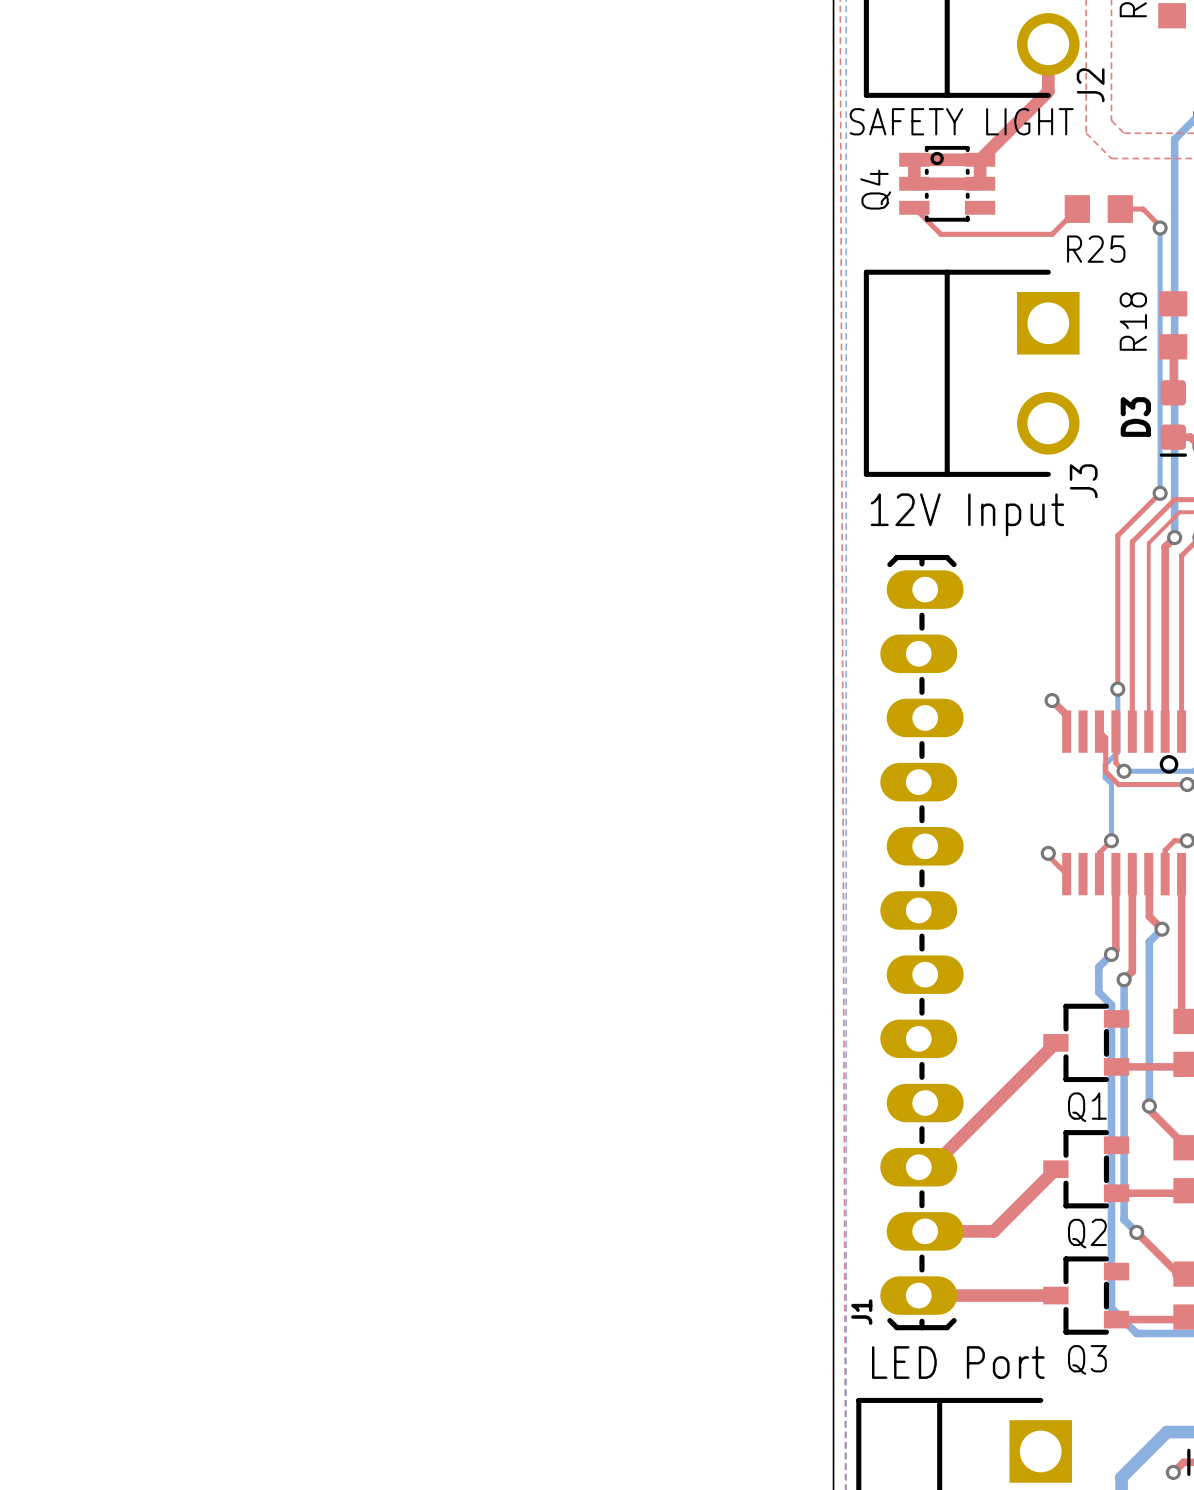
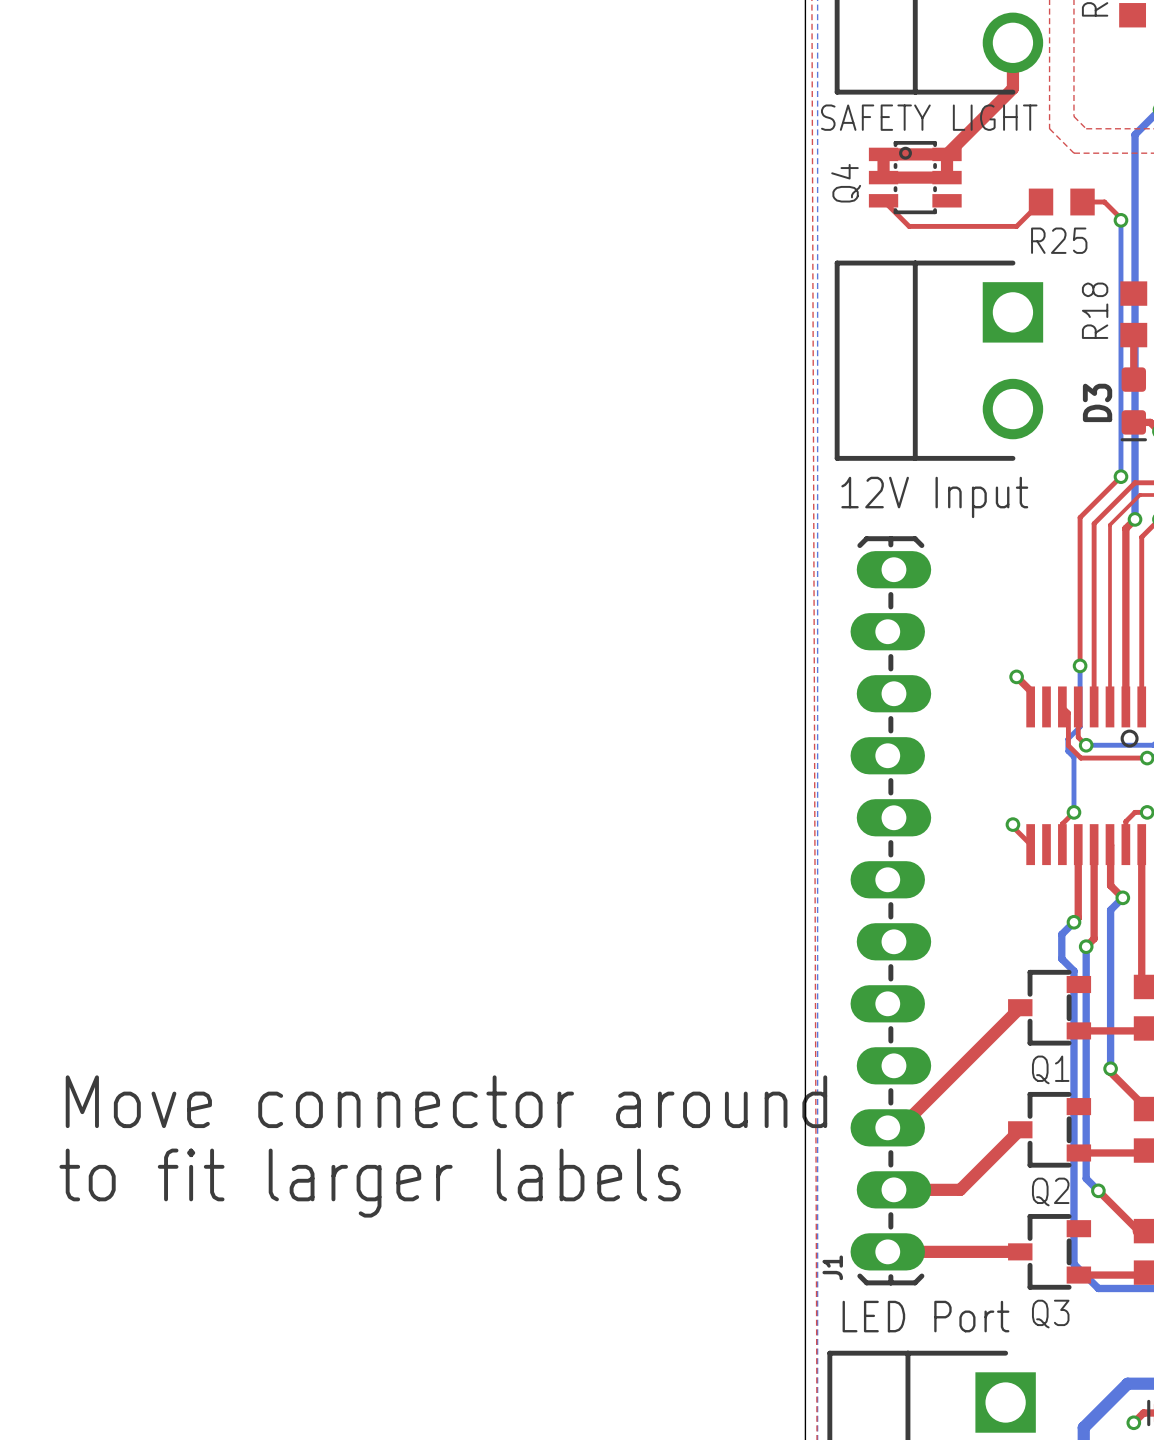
J2 name: J2 (1090, 85) -> none
J3 name: J3 (1083, 481) -> none
text: none -> Move connector around (446, 1101)
text: none -> to fit larger labels (370, 1183)

